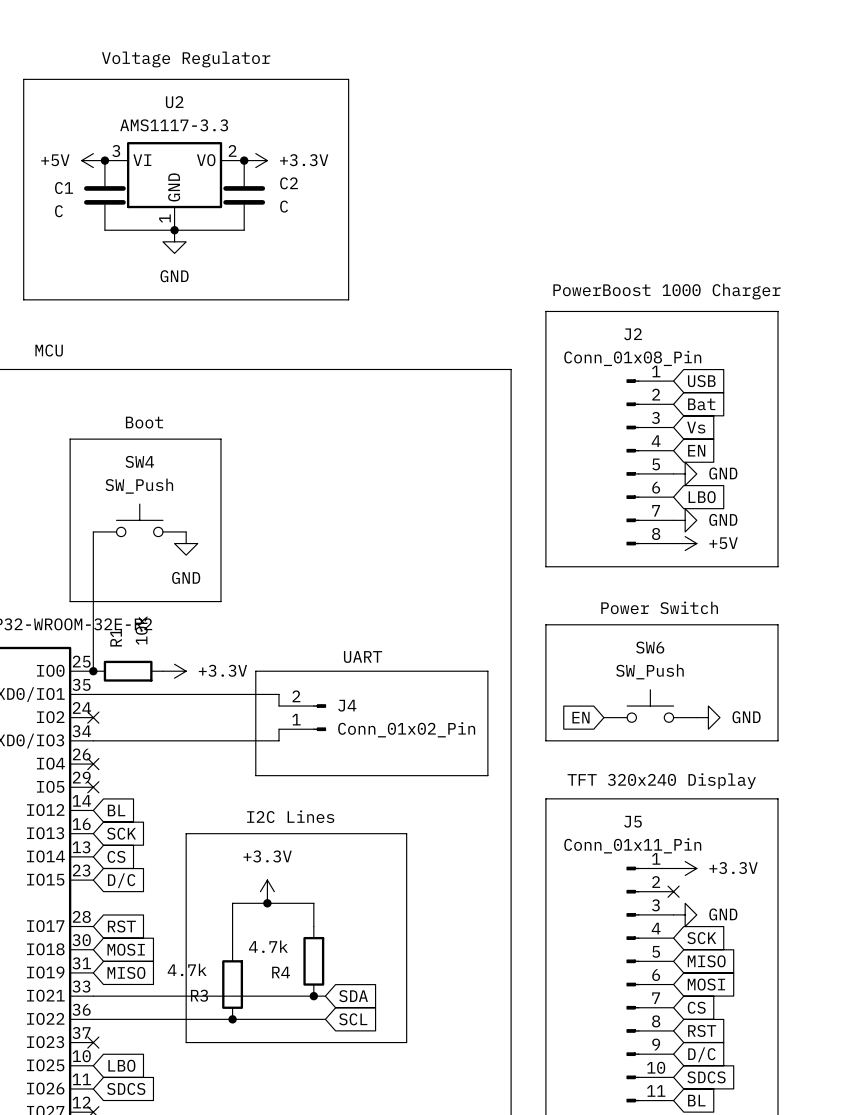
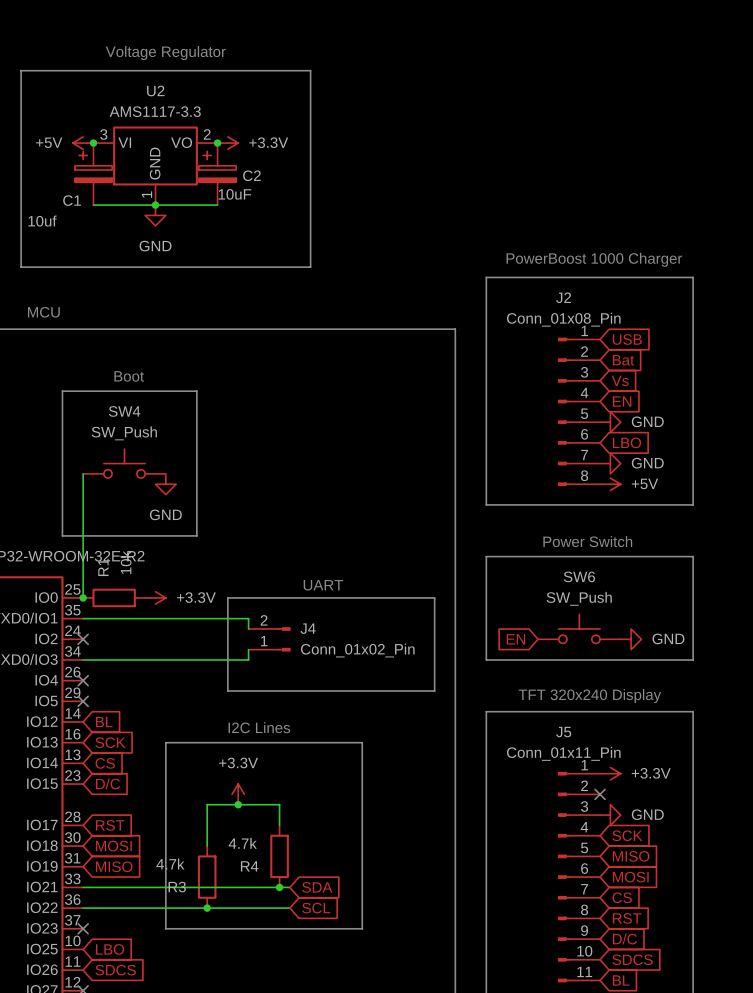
C1 symbol: [84, 160, 126, 231] -> [74, 143, 113, 206]
C2 symbol: [223, 160, 266, 231] -> [198, 143, 237, 206]
C1 name position: C1 (64, 188) -> C1 (72, 200)
C2 value: C (284, 206) -> 10uF (234, 194)
C1 value: C (58, 211) -> 10uf (42, 221)

